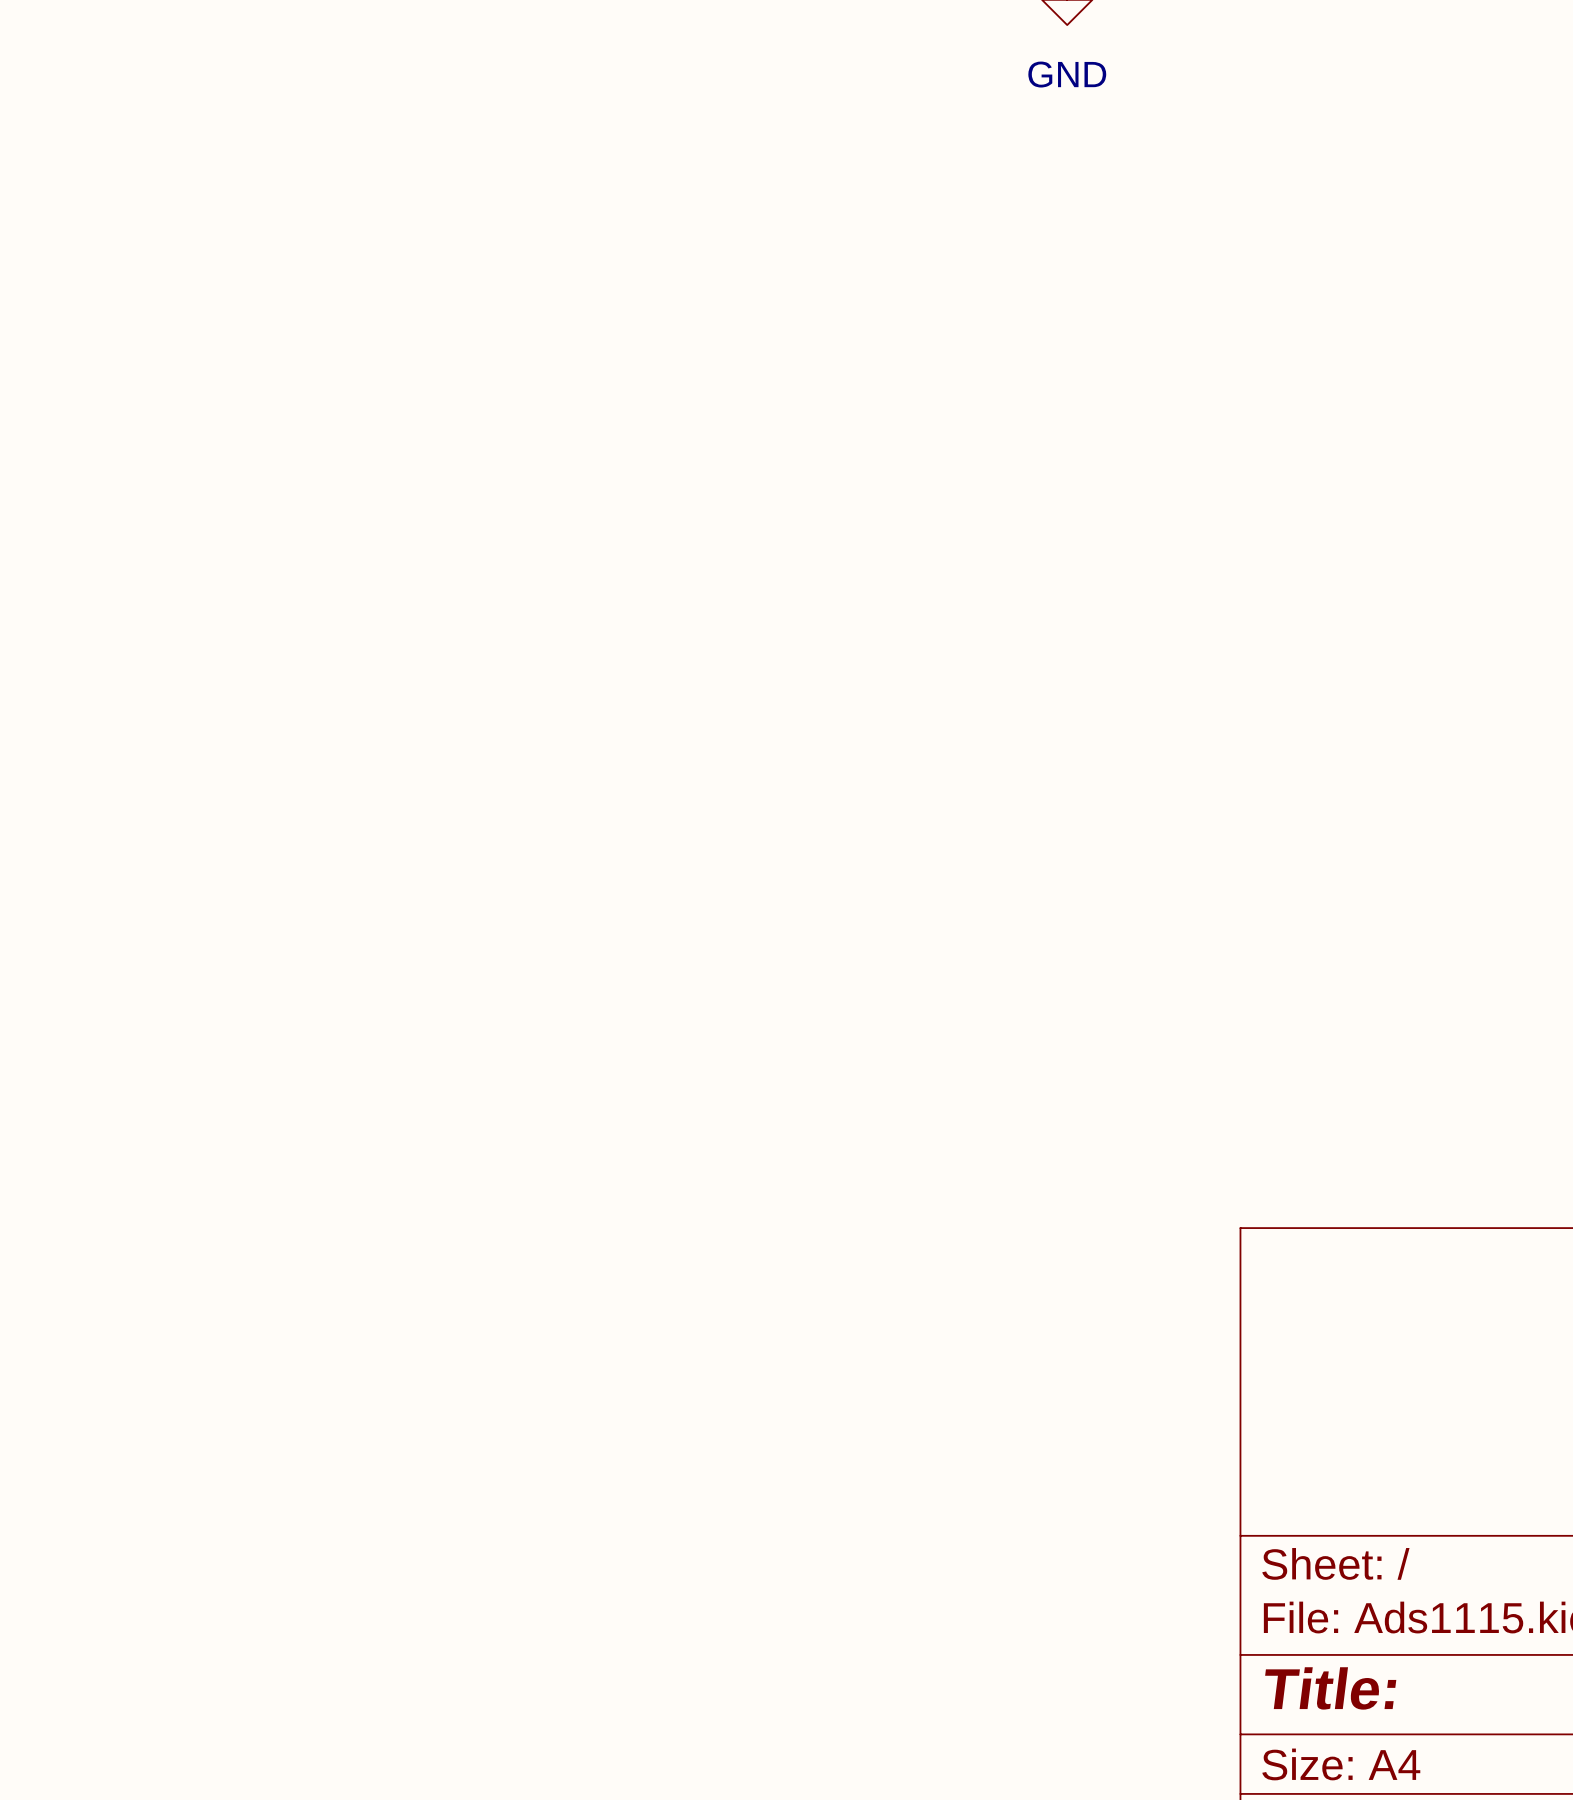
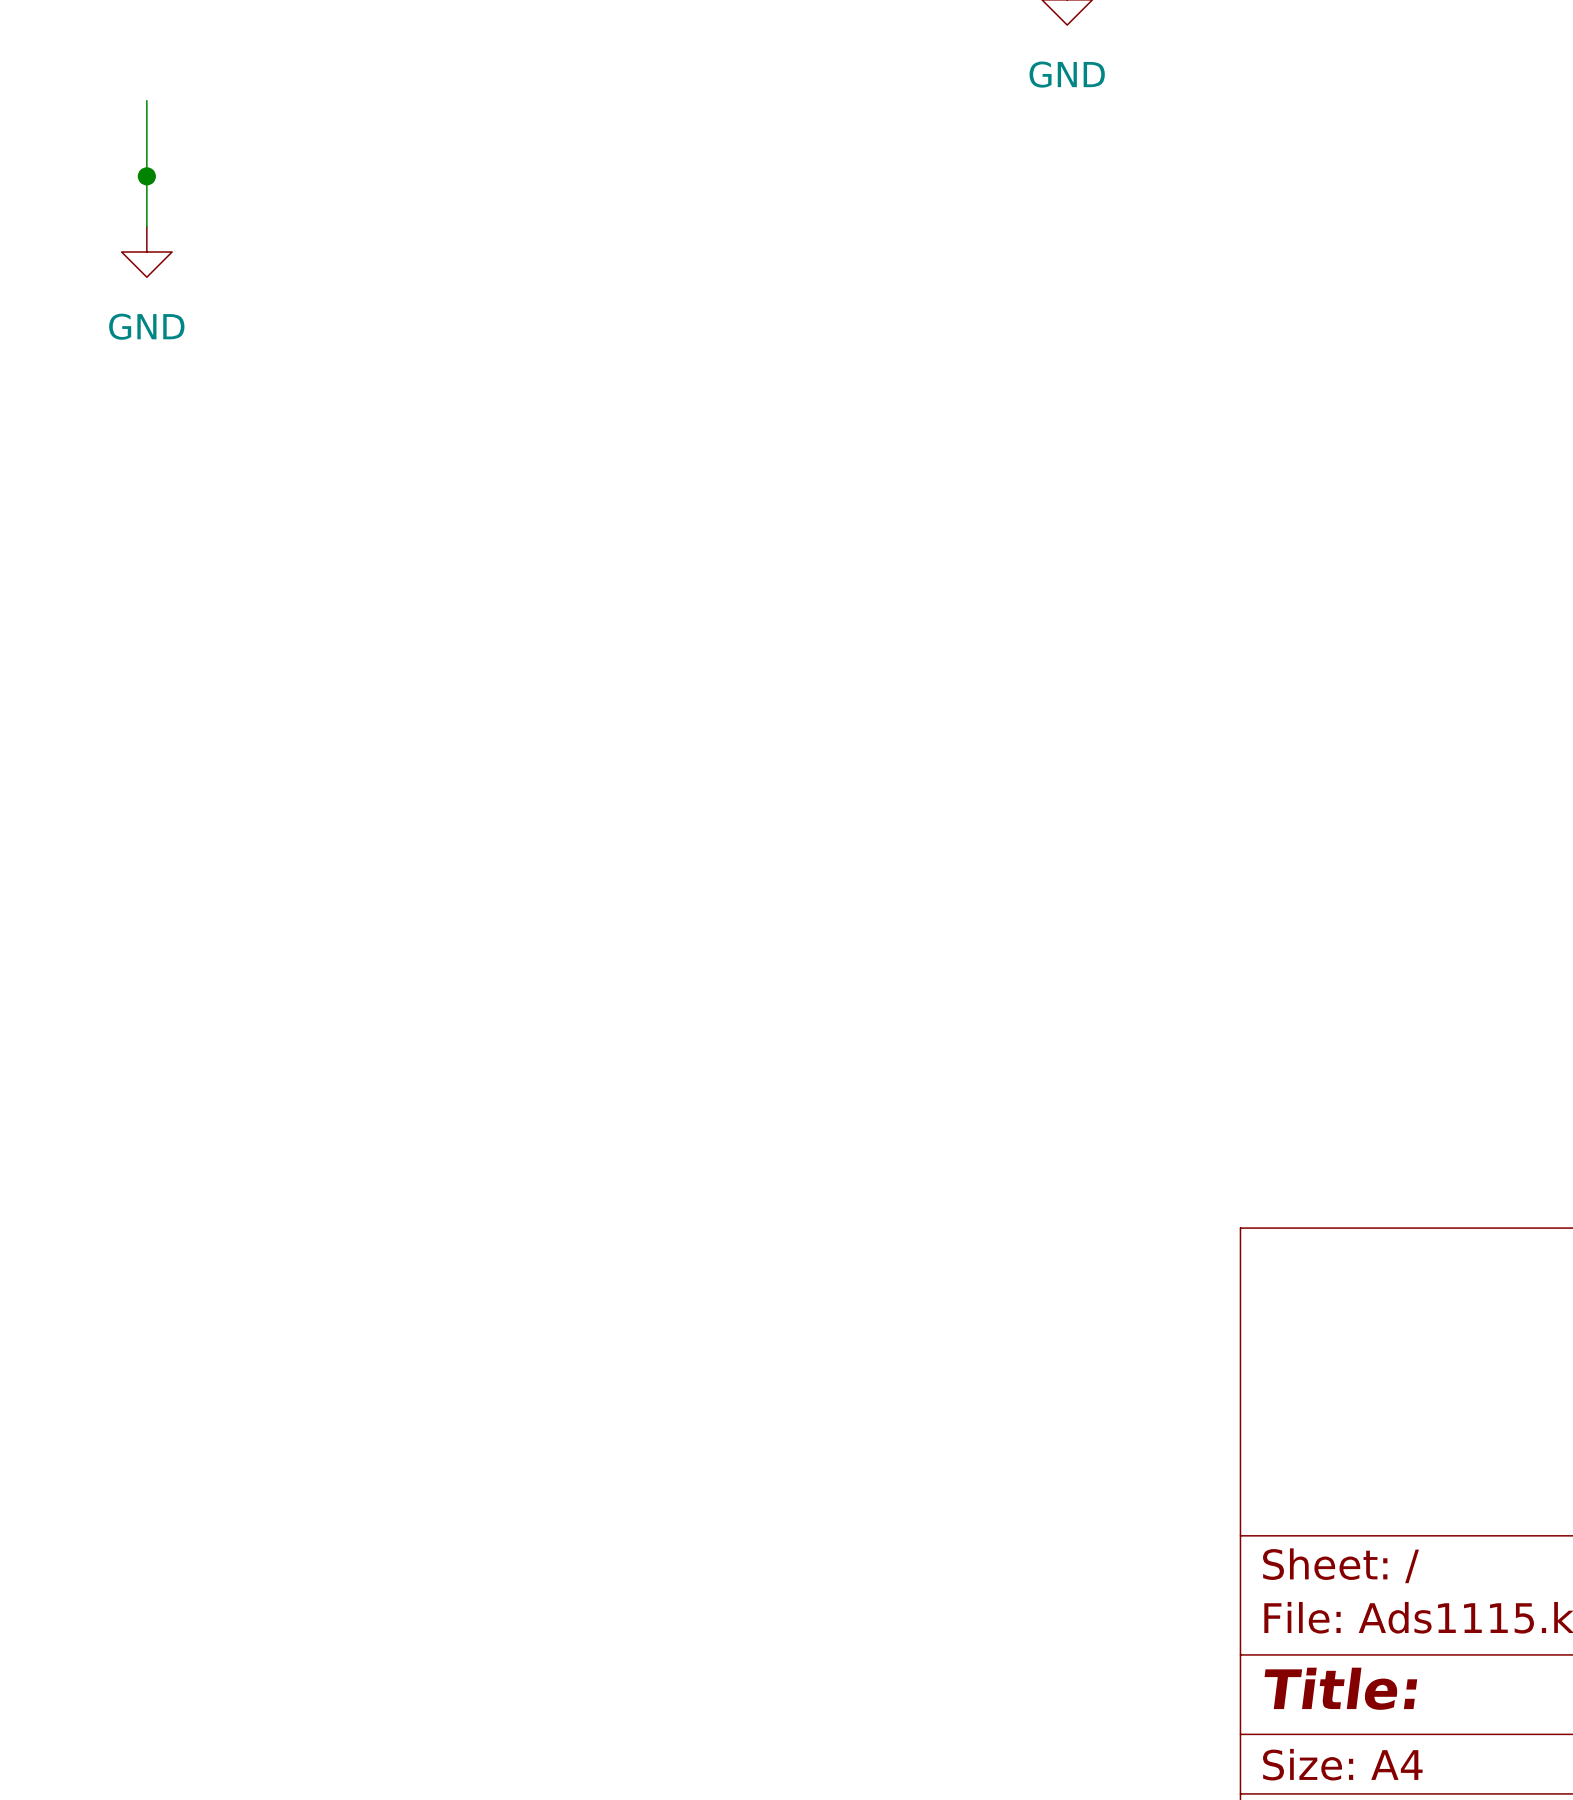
wire: none -> (146, 100) (146, 226)
junction: none -> (146, 176)
power symbol: none -> GND (146, 252)

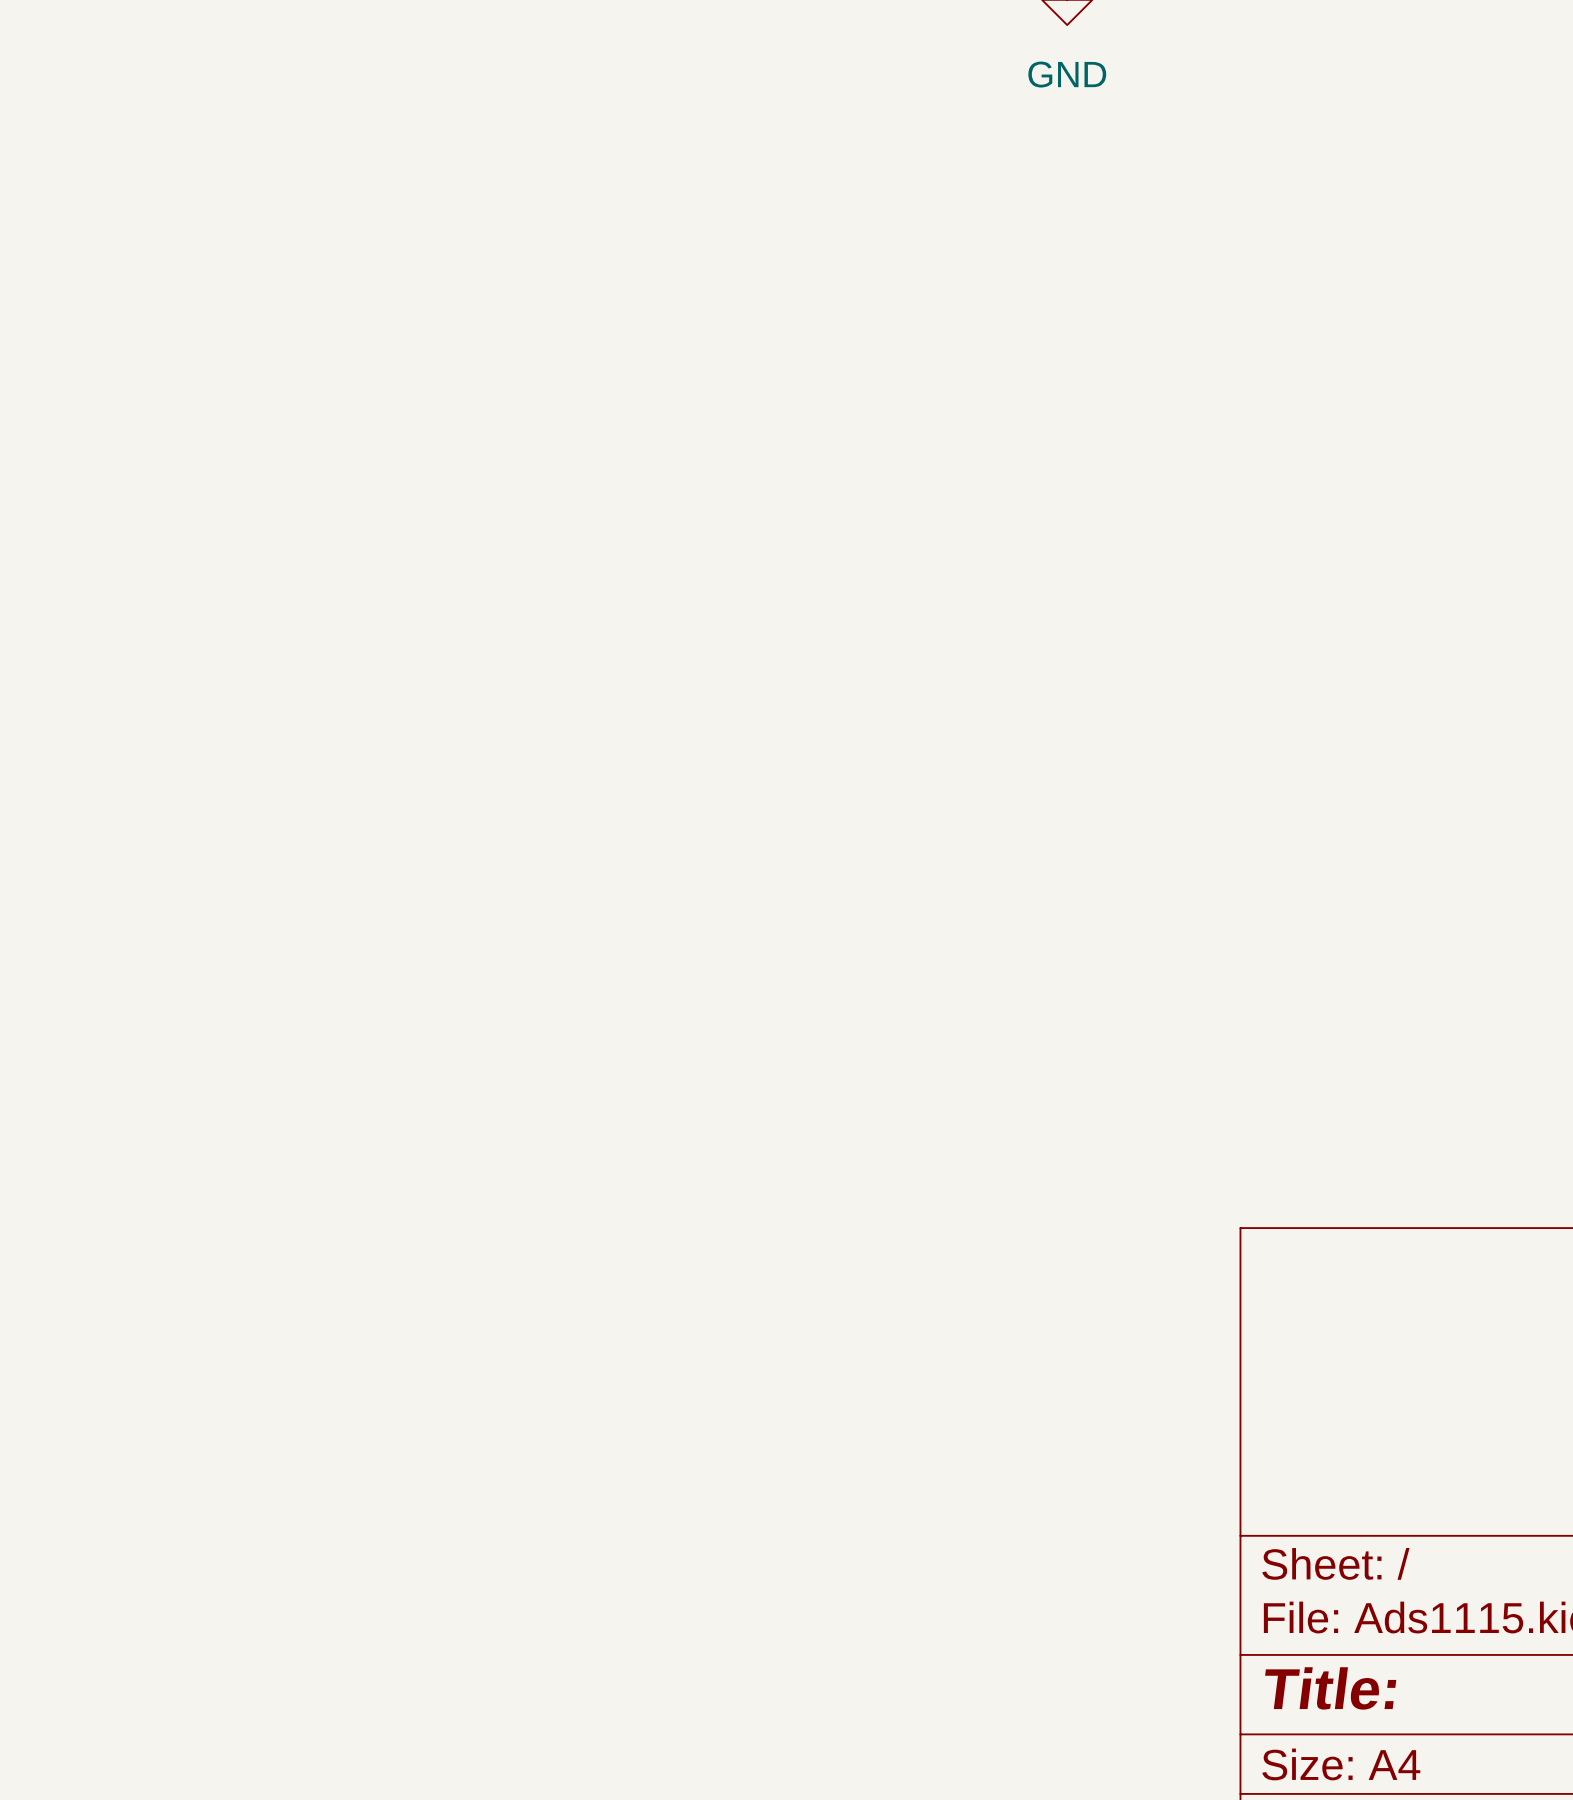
wire: (146, 100) (146, 226) -> none
junction: (146, 176) -> none
power symbol: GND (146, 252) -> none

